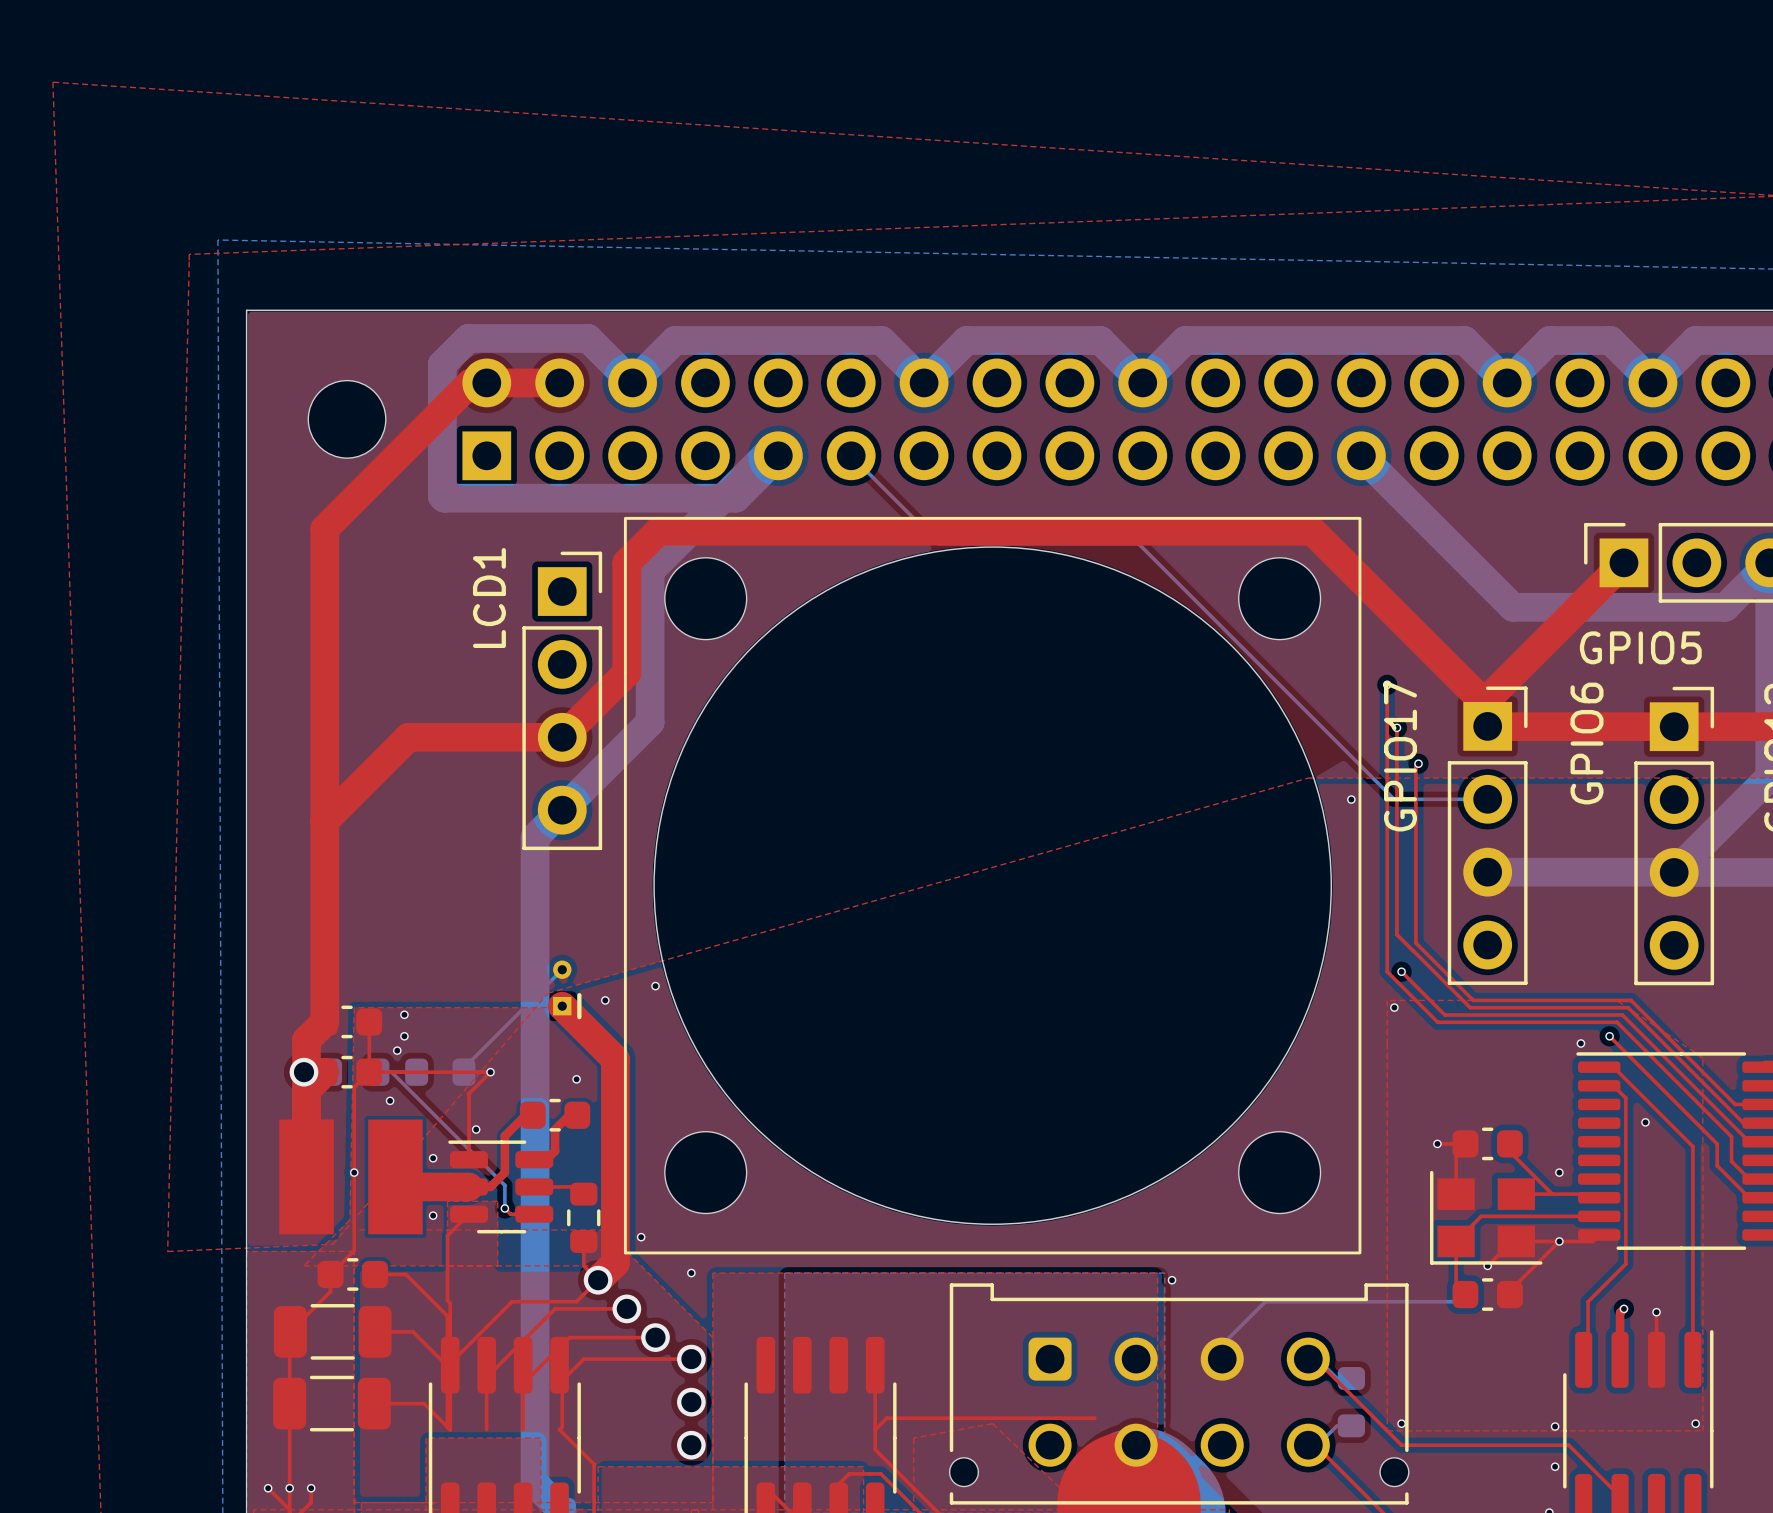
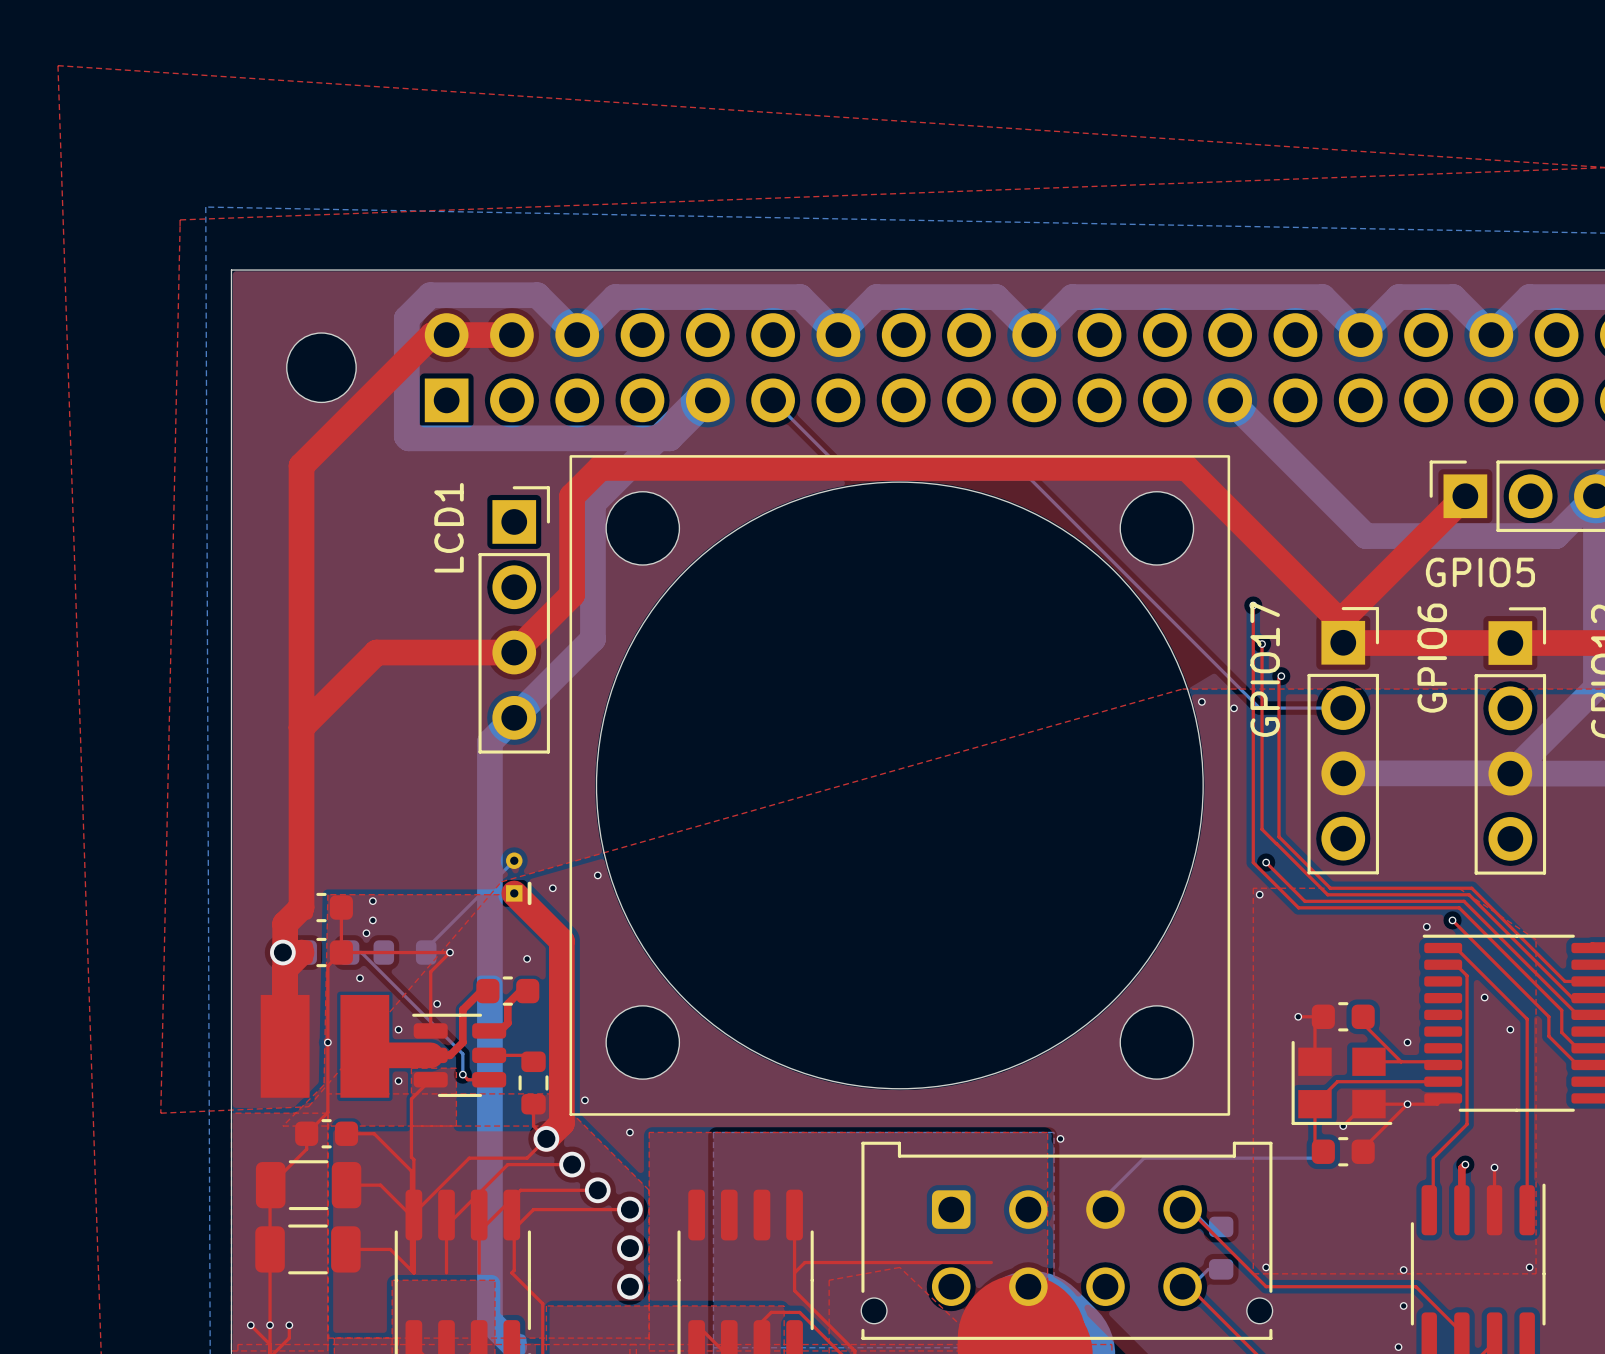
via: none -> (1201, 701)
via: (1351, 799) -> none
via: none -> (1234, 708)
via: none -> (1510, 1029)

